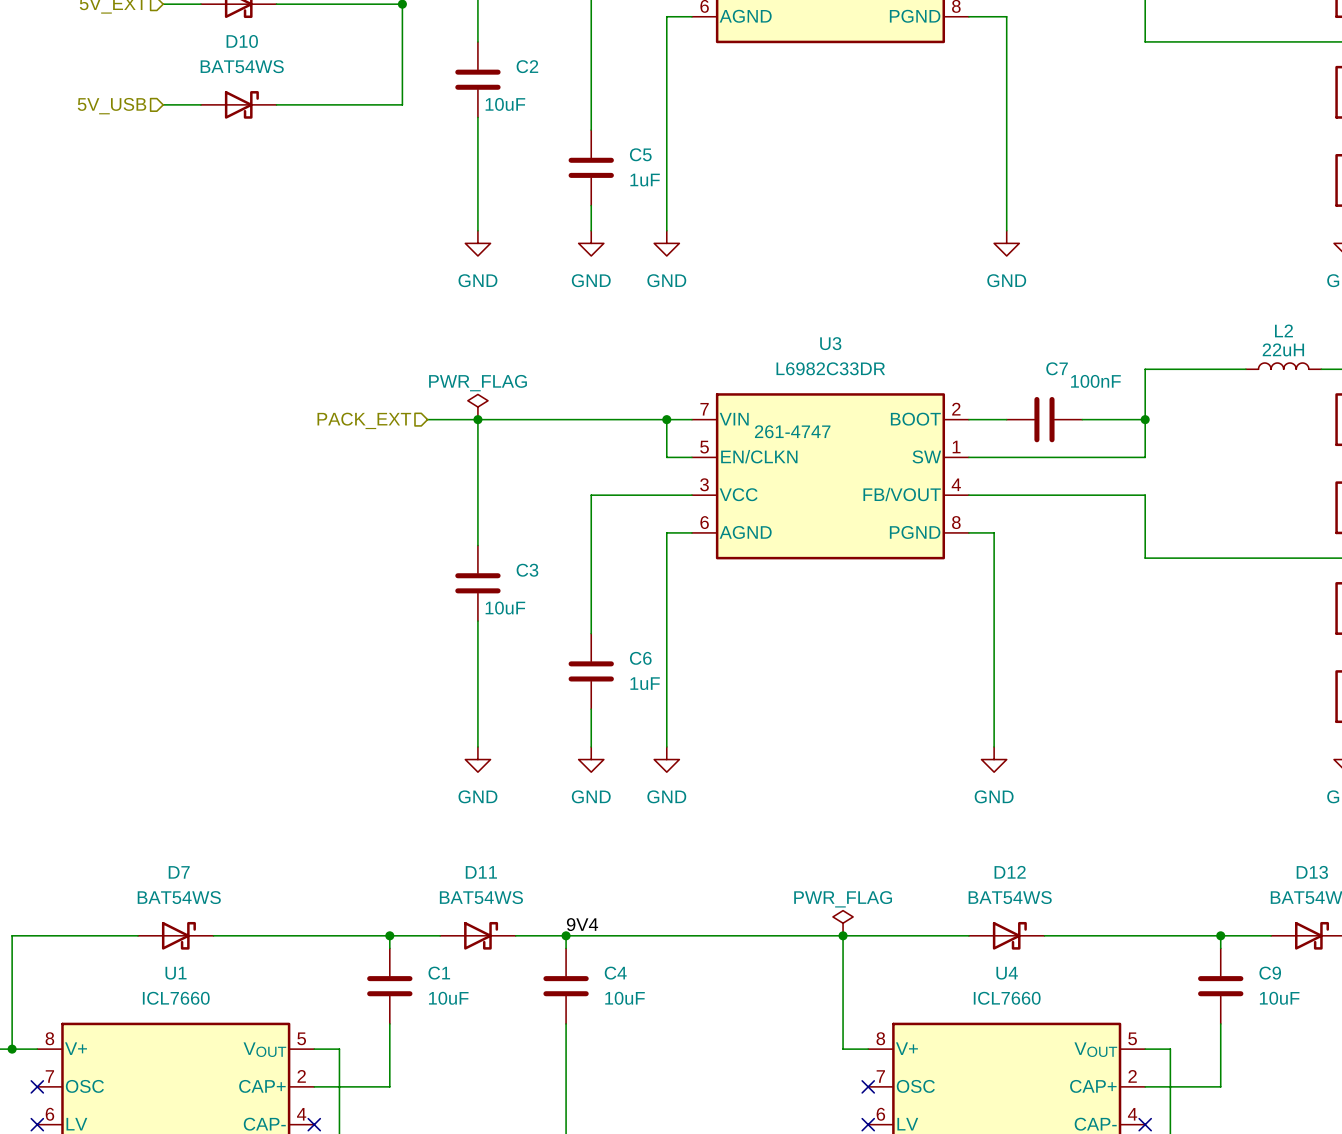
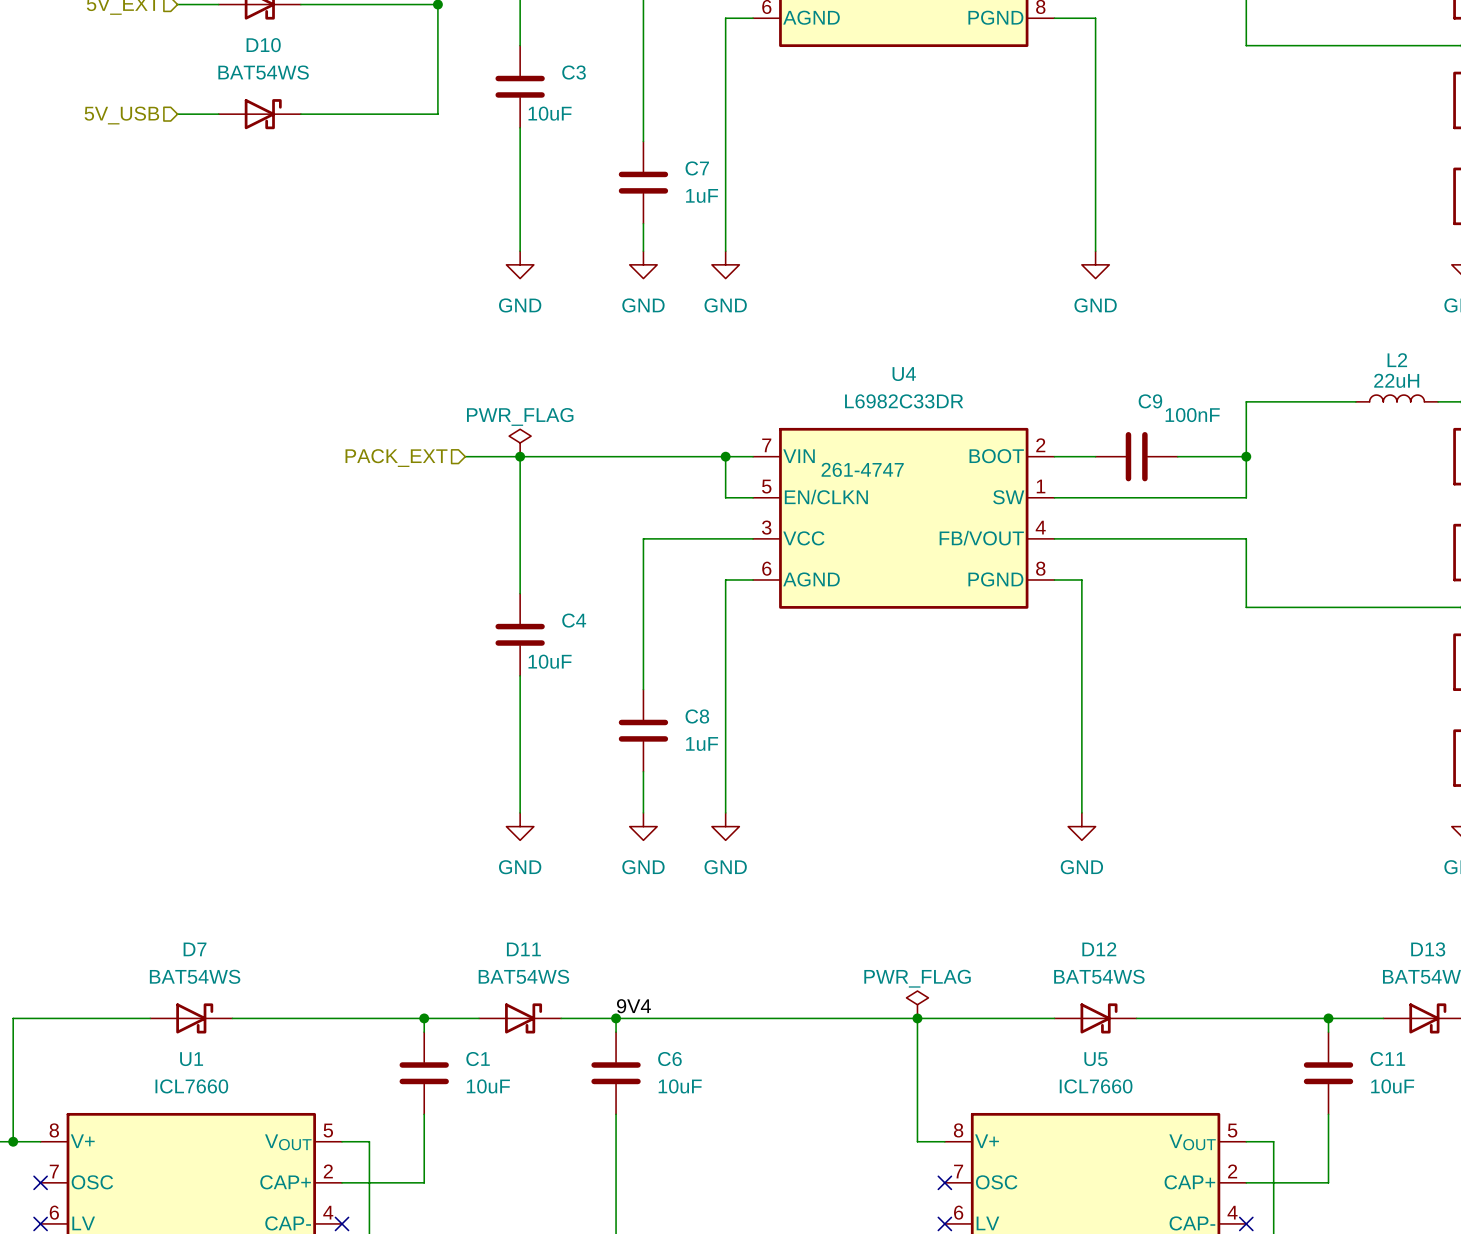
C2 name: C2 (527, 66) -> C3 (574, 72)
C5 name: C5 (640, 154) -> C7 (697, 168)
U3 name: U3 (830, 343) -> U4 (904, 374)
C7 name: C7 (1057, 368) -> C9 (1150, 401)
C3 name: C3 (527, 570) -> C4 (574, 620)
C6 name: C6 (640, 658) -> C8 (697, 716)
C4 name: C4 (615, 973) -> C6 (669, 1059)
U4 name: U4 (1007, 973) -> U5 (1095, 1059)
C9 name: C9 (1270, 973) -> C11 (1387, 1059)

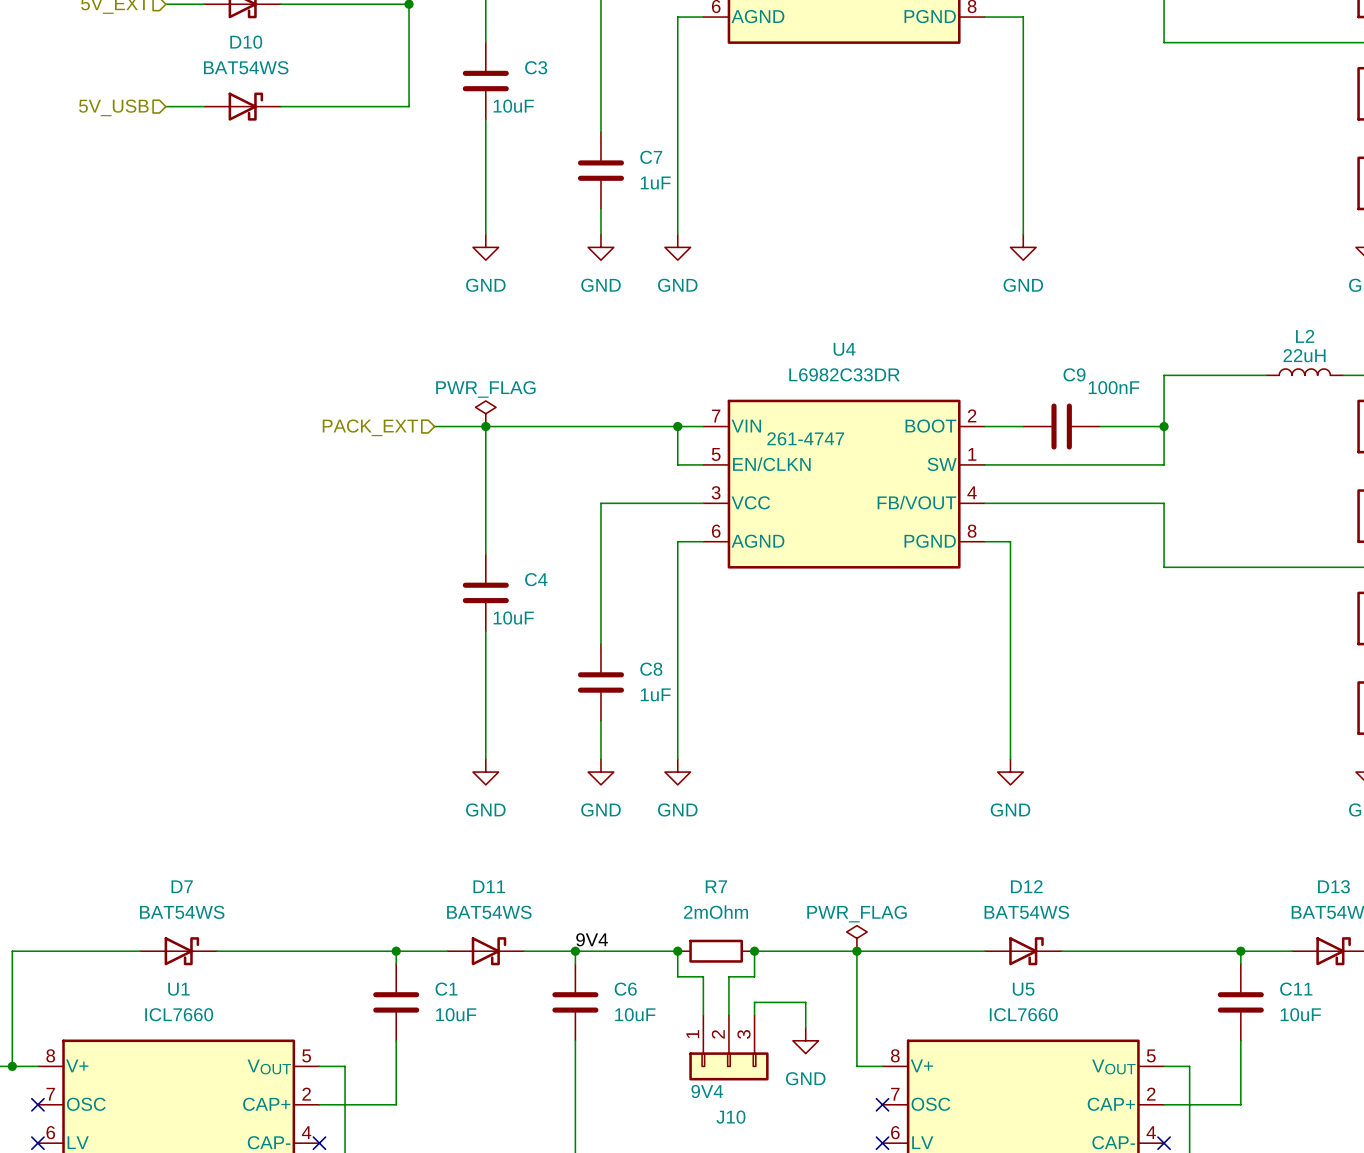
wire: (725, 1018) (807, 1018) -> (677, 951) (677, 976) (703, 976) (703, 1015)
junction: none -> (677, 951)
R7: none -> 2mOhm (716, 951)
wire: none -> (754, 951) (754, 976) (728, 976) (728, 1015)
junction: none -> (754, 951)
wire: none -> (754, 1015) (754, 1002) (805, 1002) (805, 1028)
power symbol: none -> GND (805, 1040)
J10: none -> 9V4 (728, 1047)

